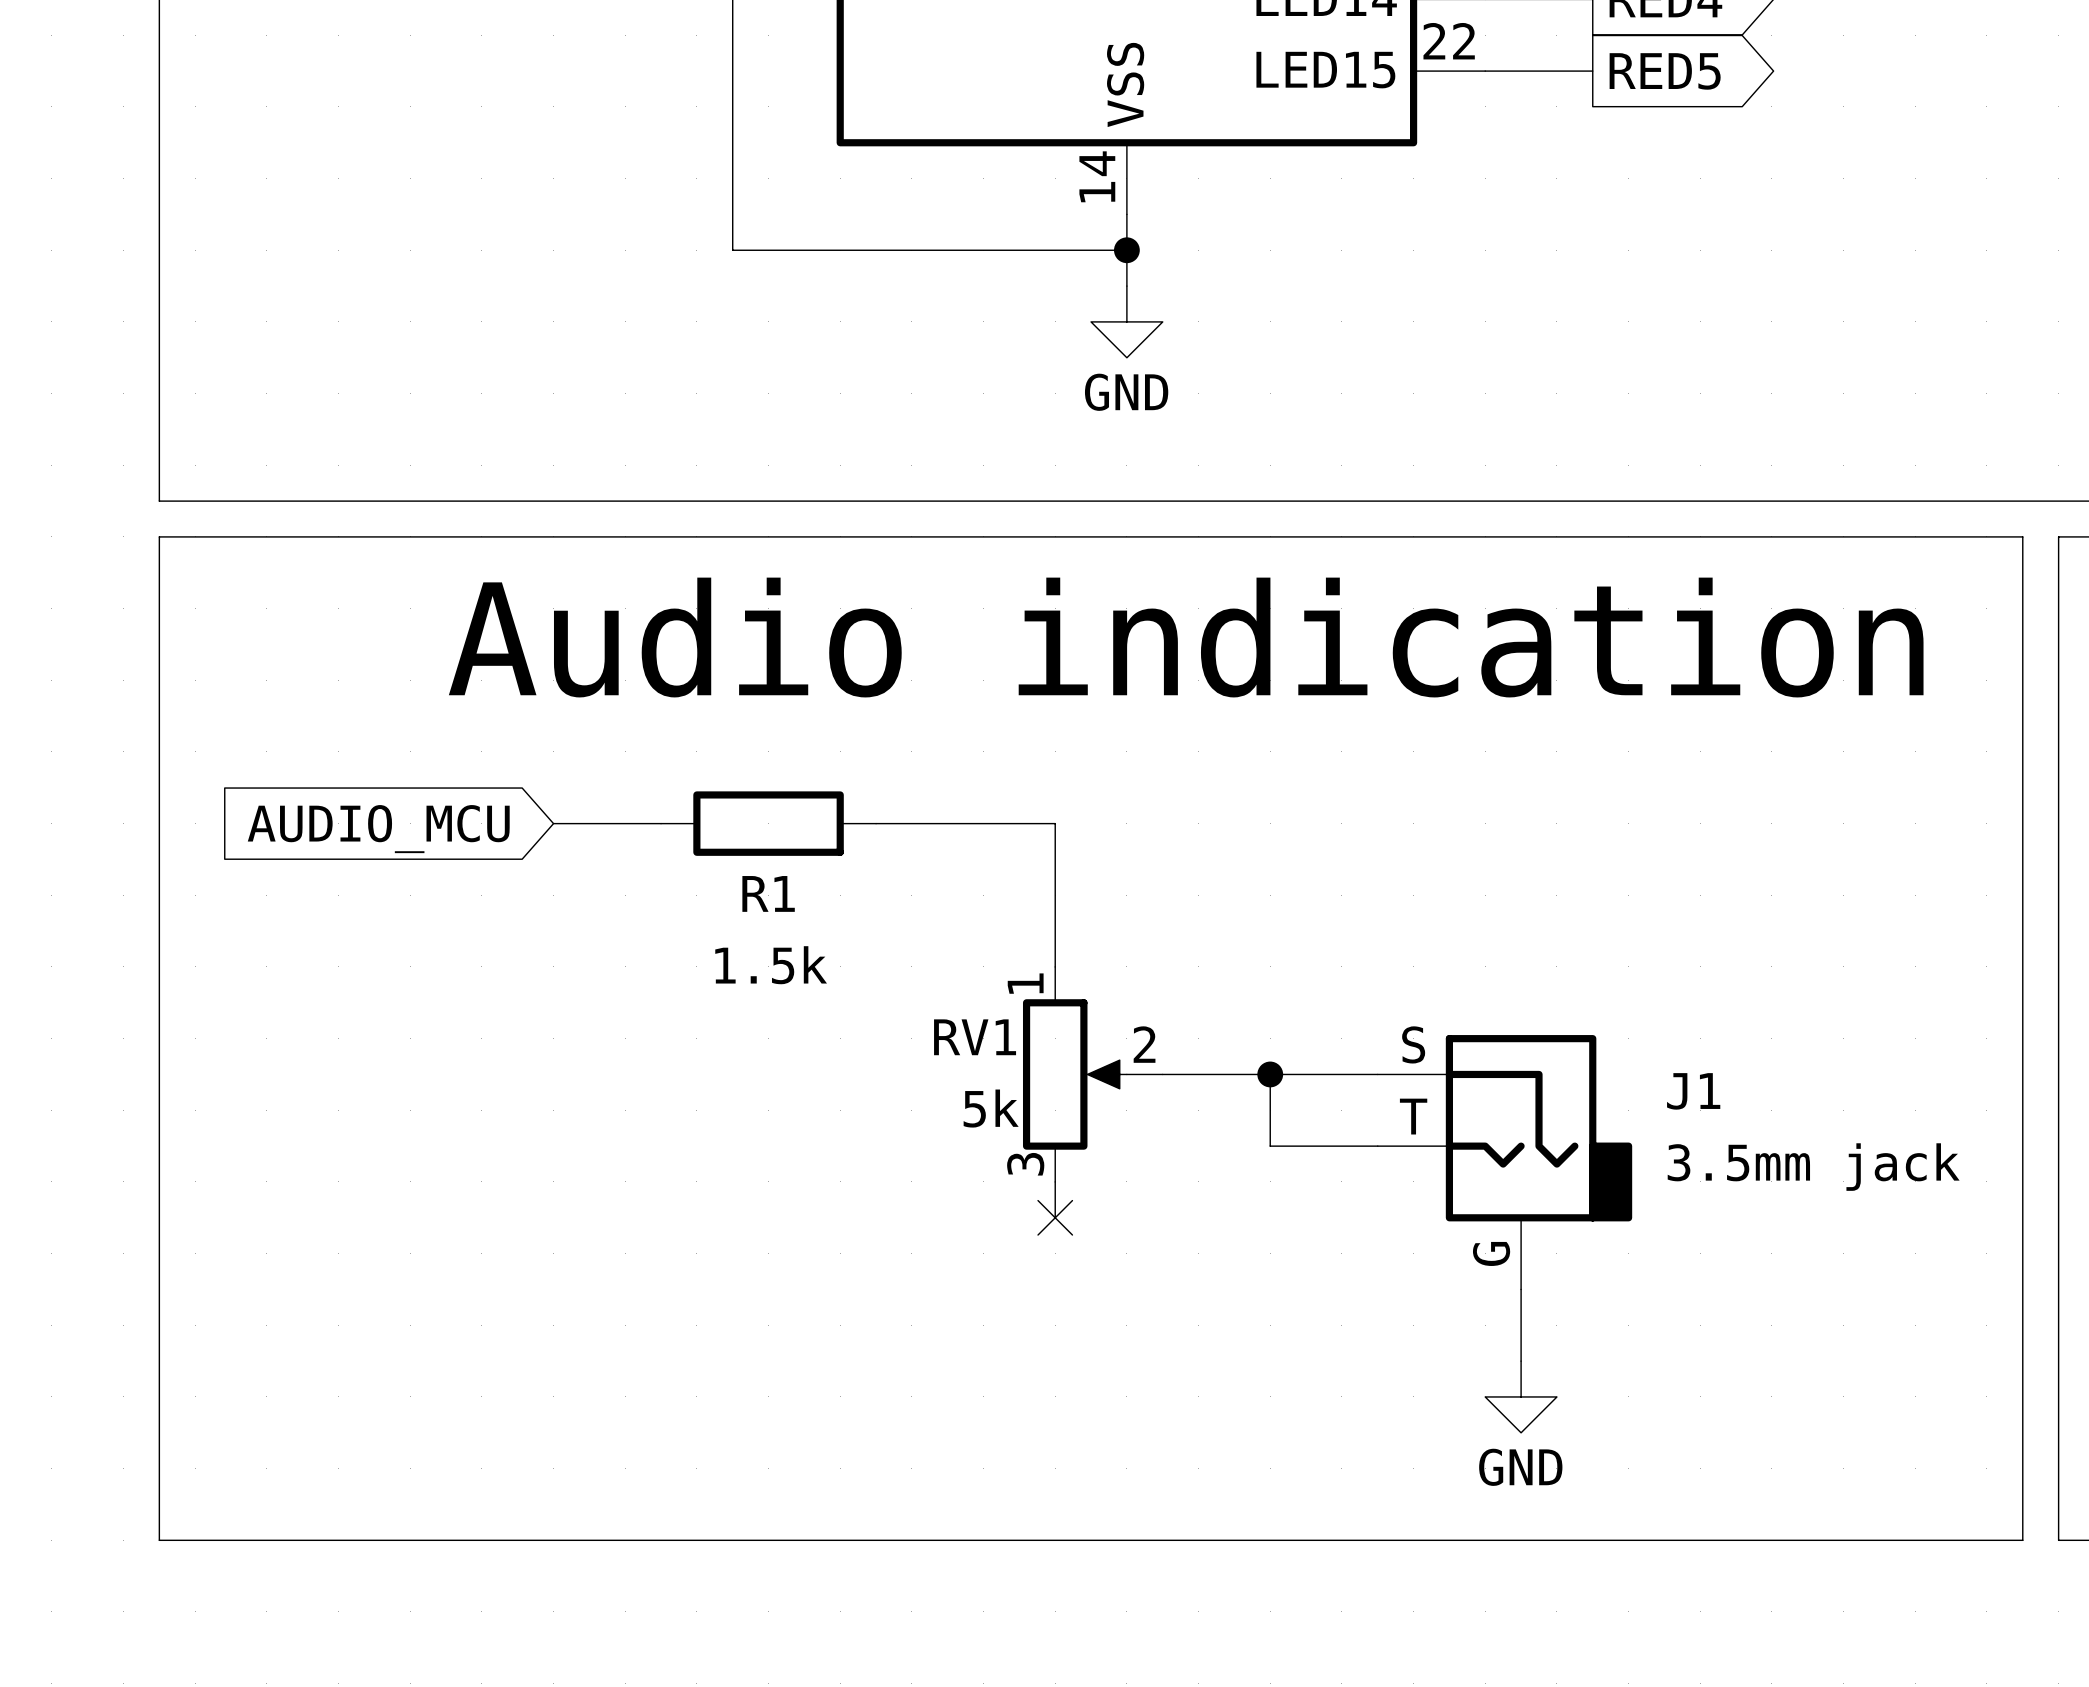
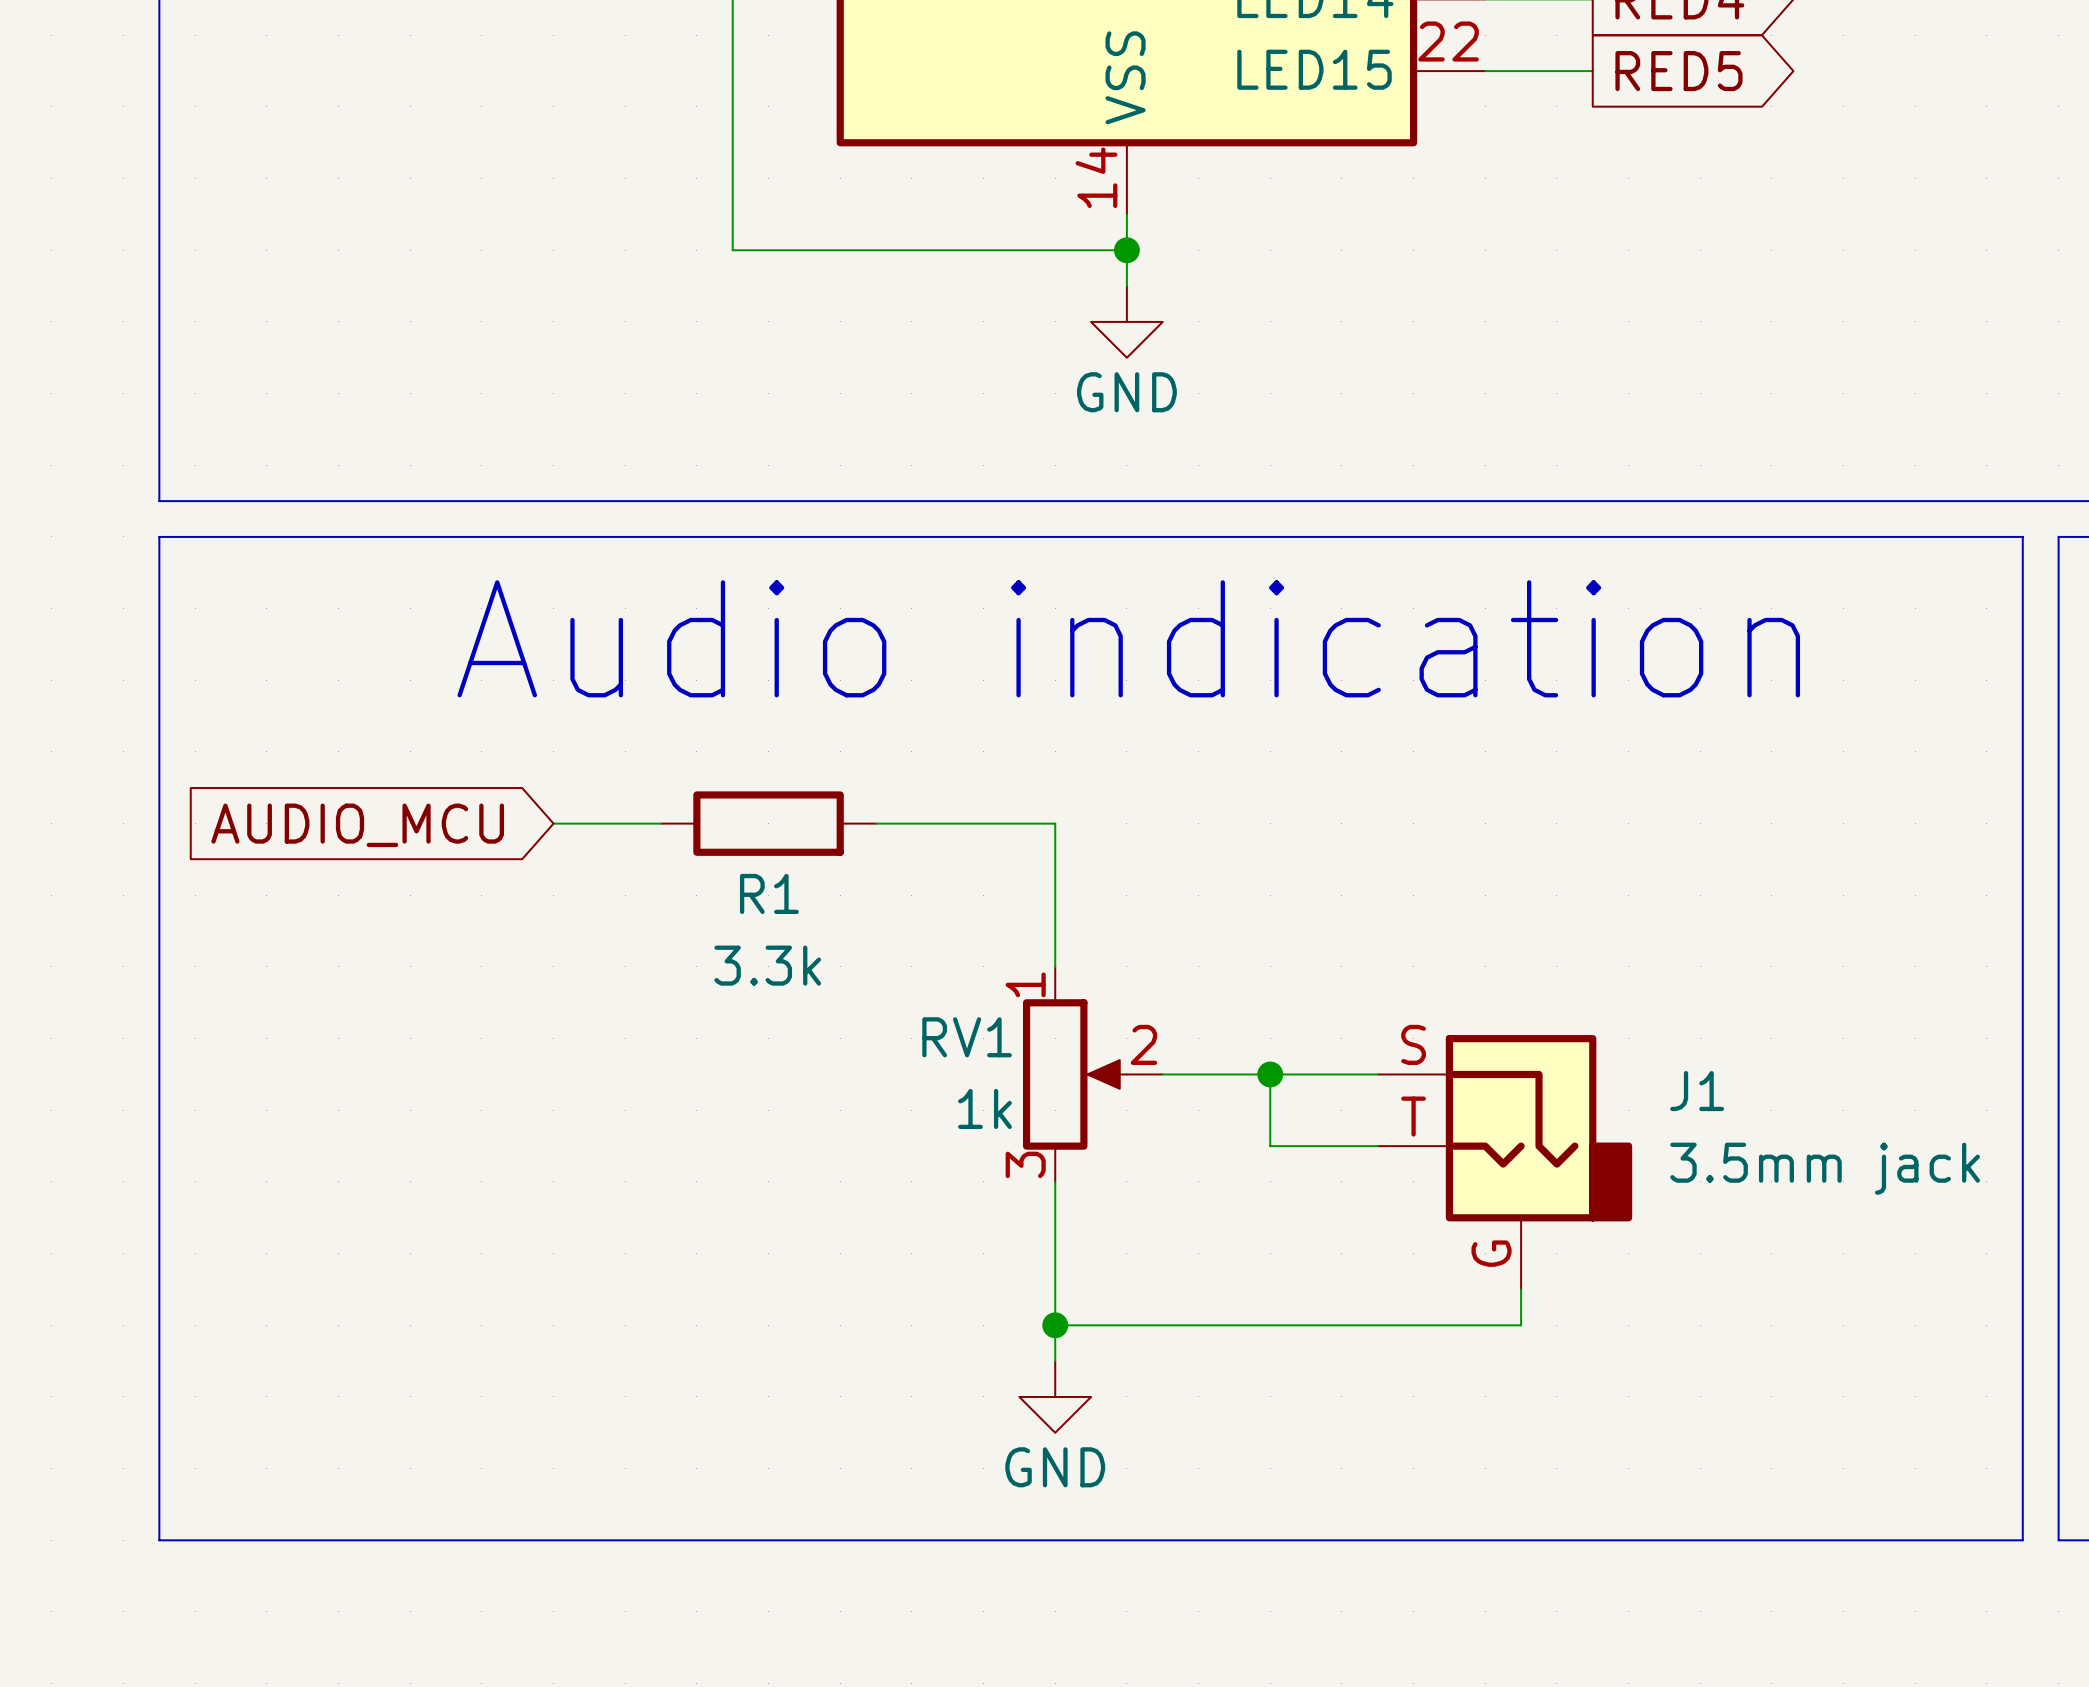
R1 value: 1.5k (771, 965) -> 3.3k (767, 965)
RV1 value: 5k (991, 1108) -> 1k (985, 1108)
wire: none -> (1055, 1217) (1055, 1361)
no-connect mark: (1055, 1217) -> none
junction: none -> (1055, 1325)
wire: (1521, 1325) (1521, 1361) -> (1521, 1325) (1055, 1325)
power symbol position: GND (1521, 1396) -> GND (1055, 1396)

